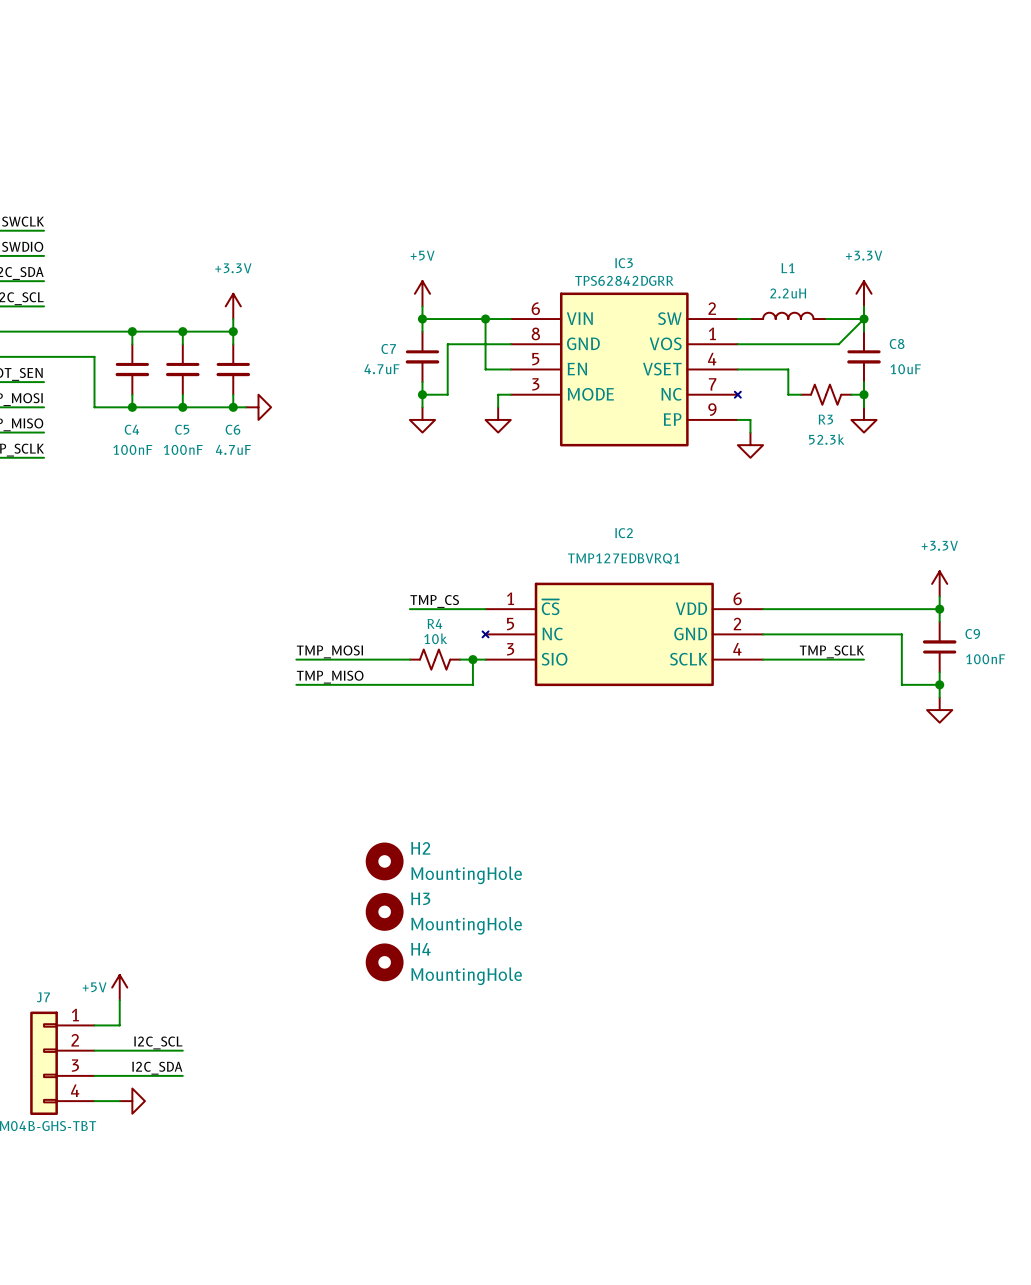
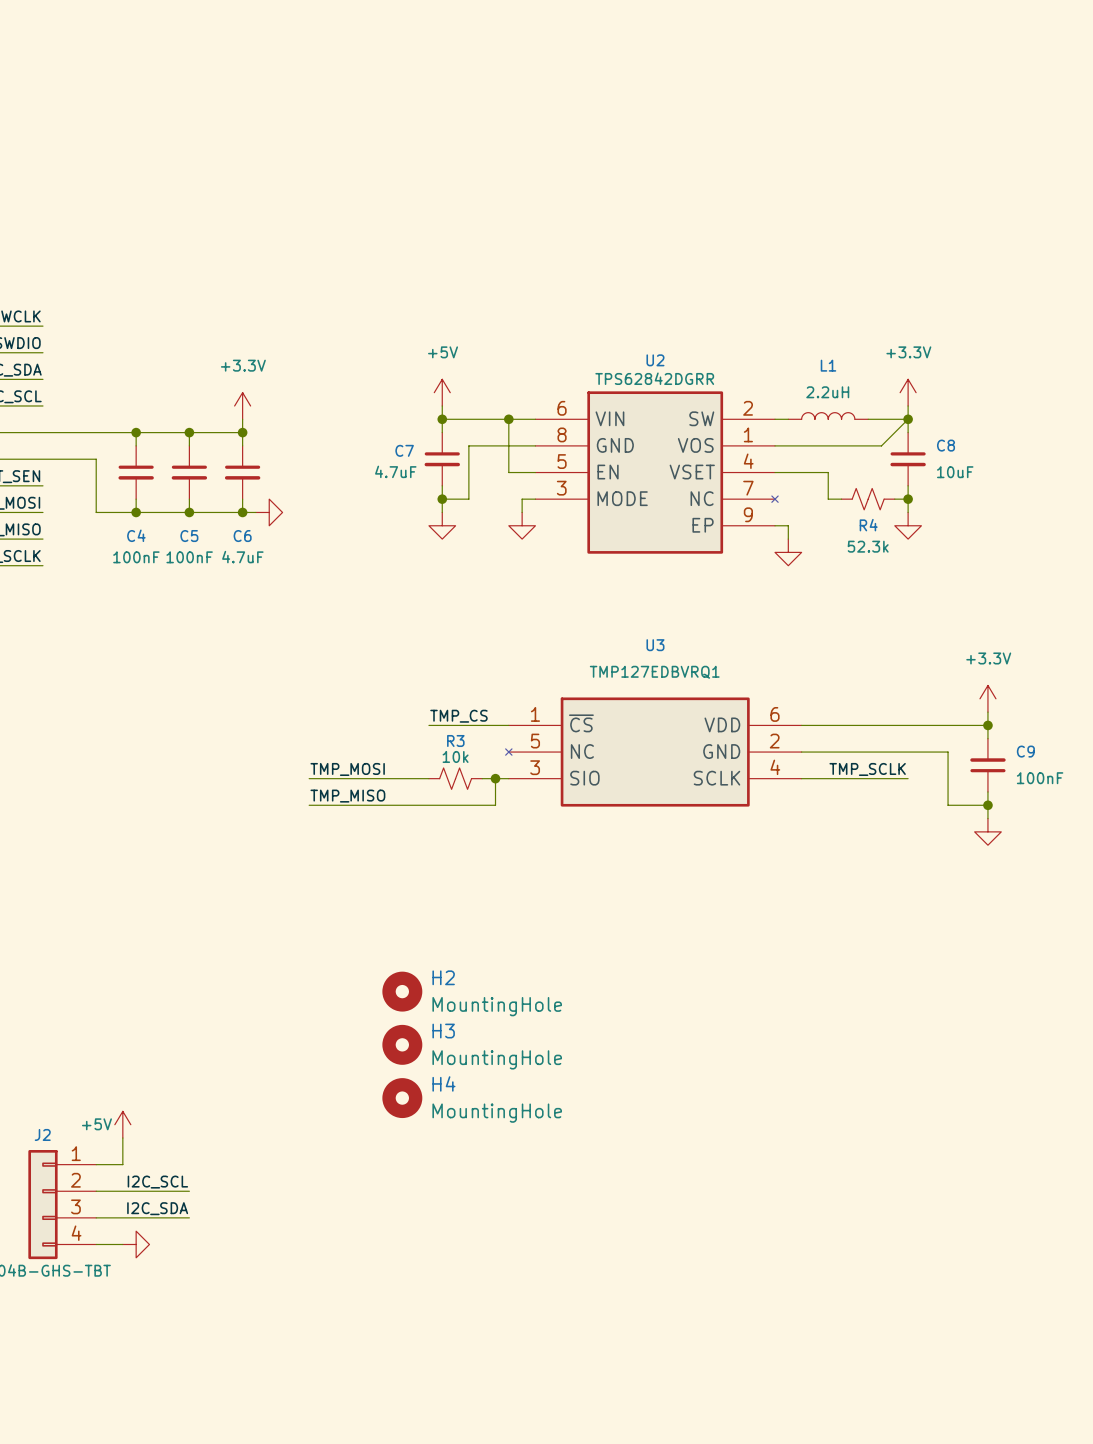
IC3 name: IC3 (624, 263) -> U2 (655, 360)
R3 name: R3 (825, 419) -> R4 (868, 525)
IC2 name: IC2 (624, 533) -> U3 (655, 645)
R4 name: R4 (434, 623) -> R3 (455, 741)
J7 name: J7 (43, 997) -> J2 (42, 1134)

